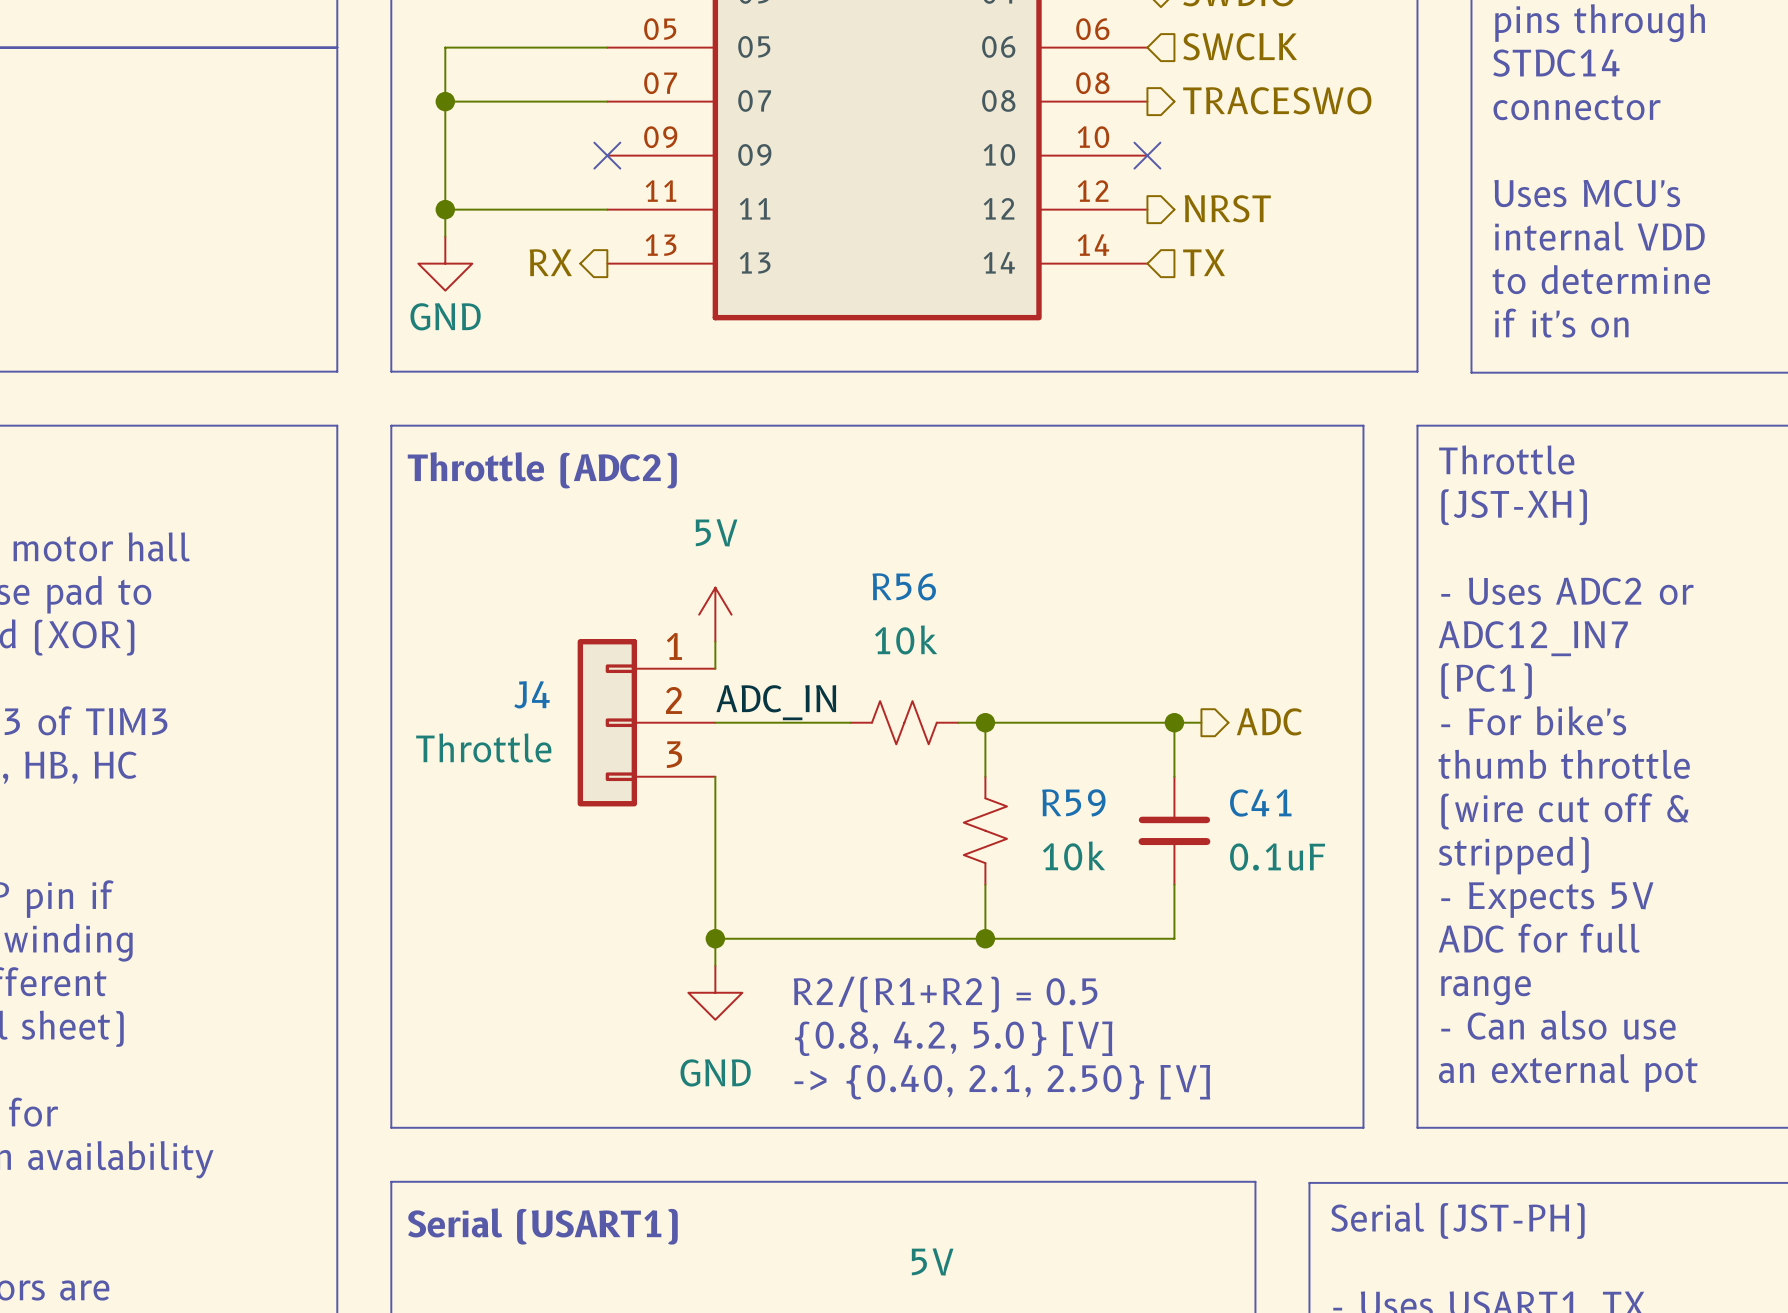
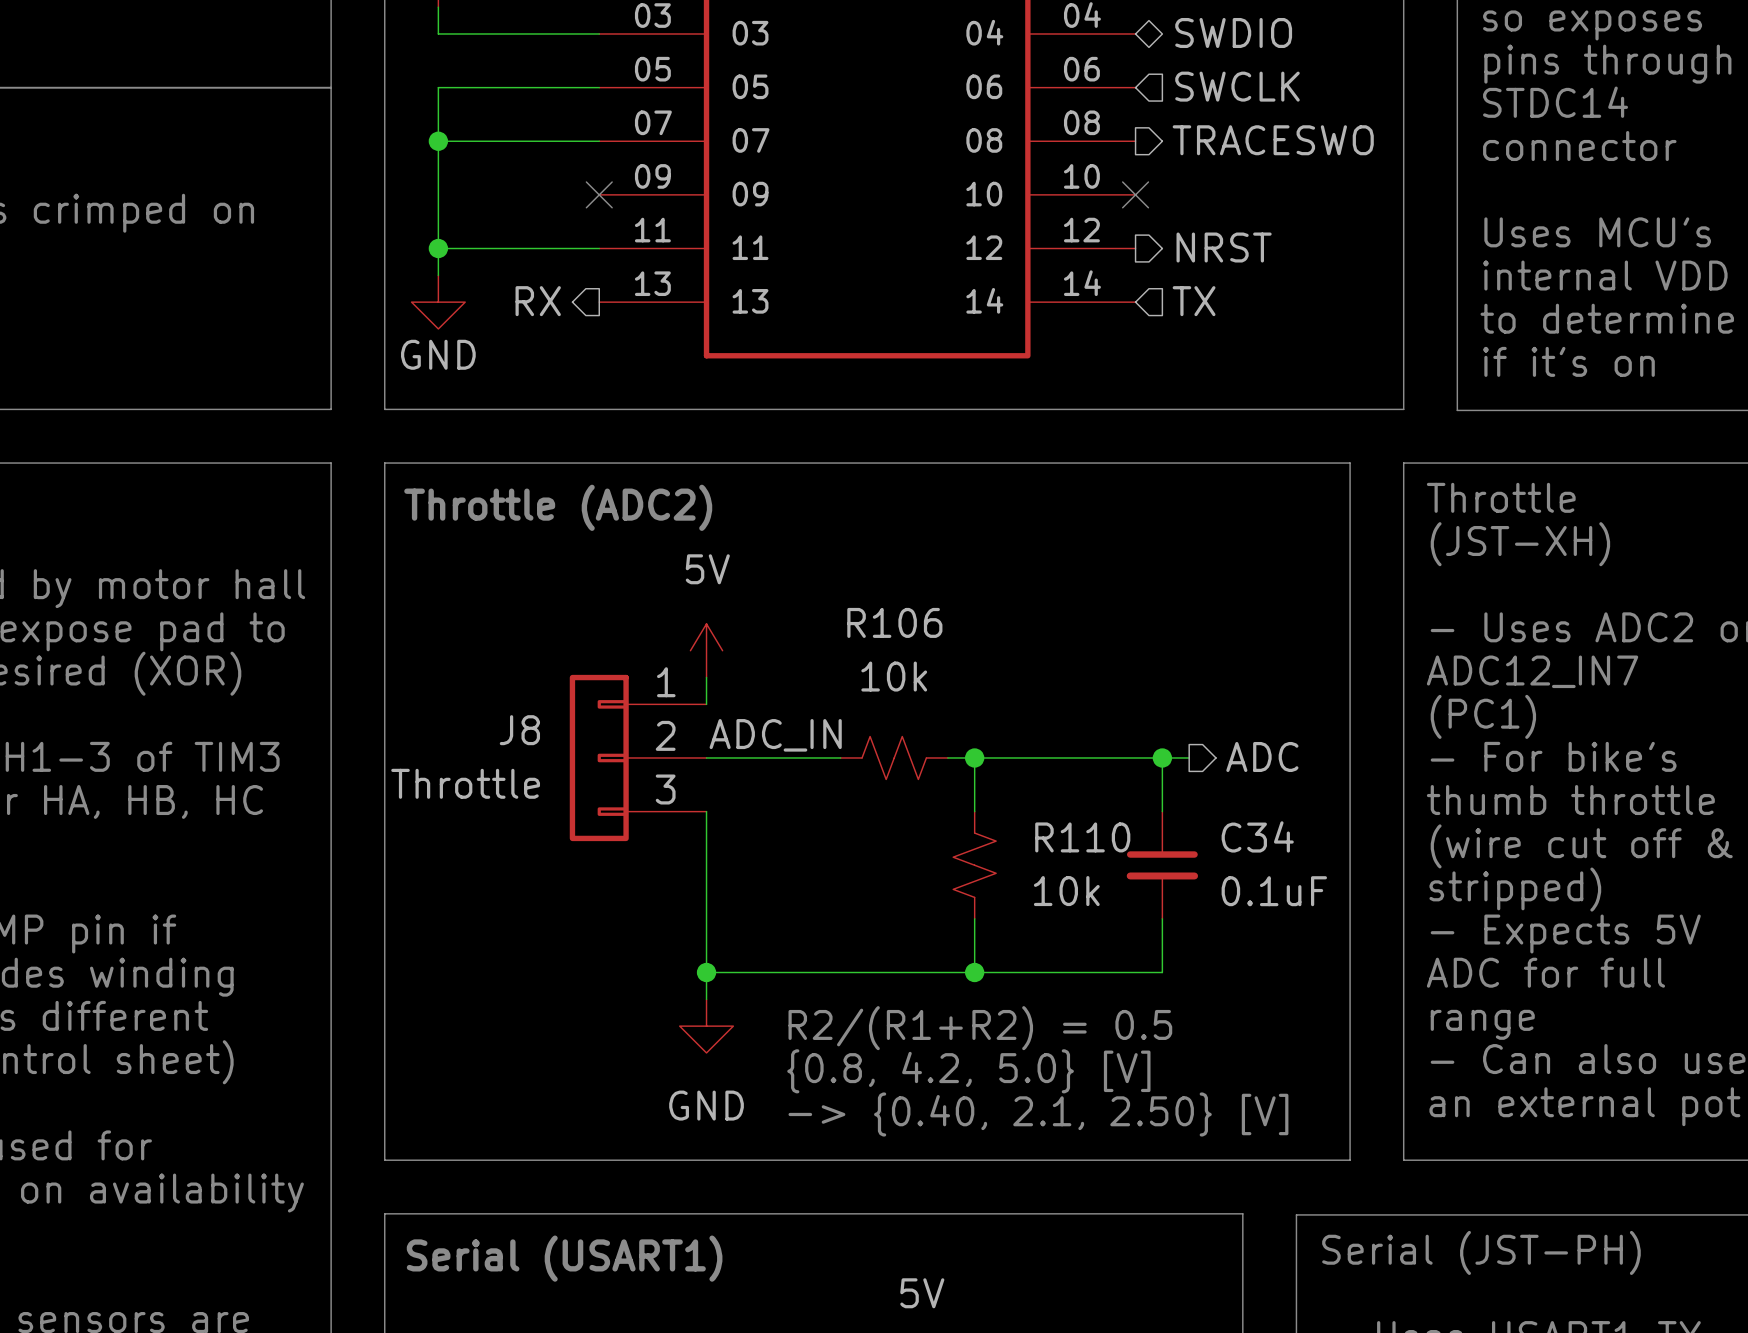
R56 name: R56 (904, 586) -> R106 (894, 622)
J4 name: J4 (532, 694) -> J8 (519, 730)
R59 name: R59 (1073, 802) -> R110 (1082, 837)
C41 name: C41 (1260, 803) -> C34 (1257, 836)

